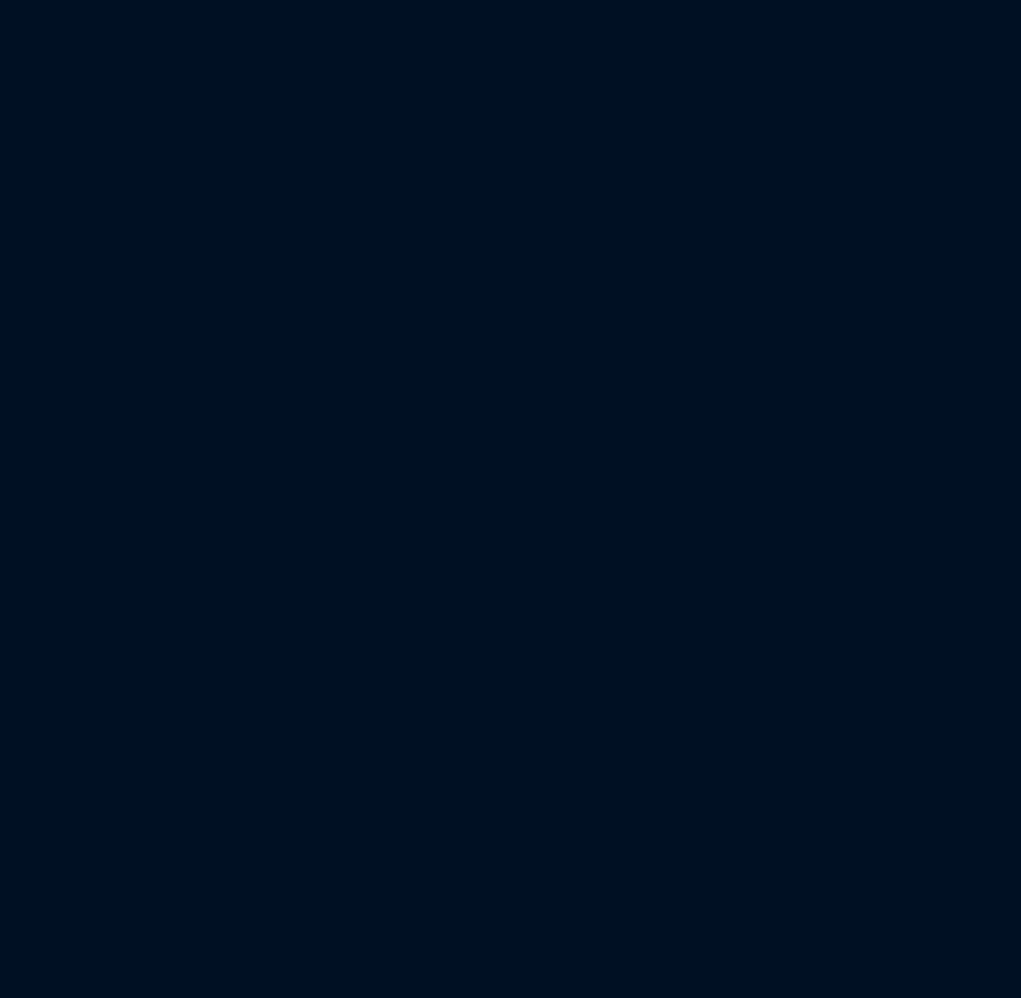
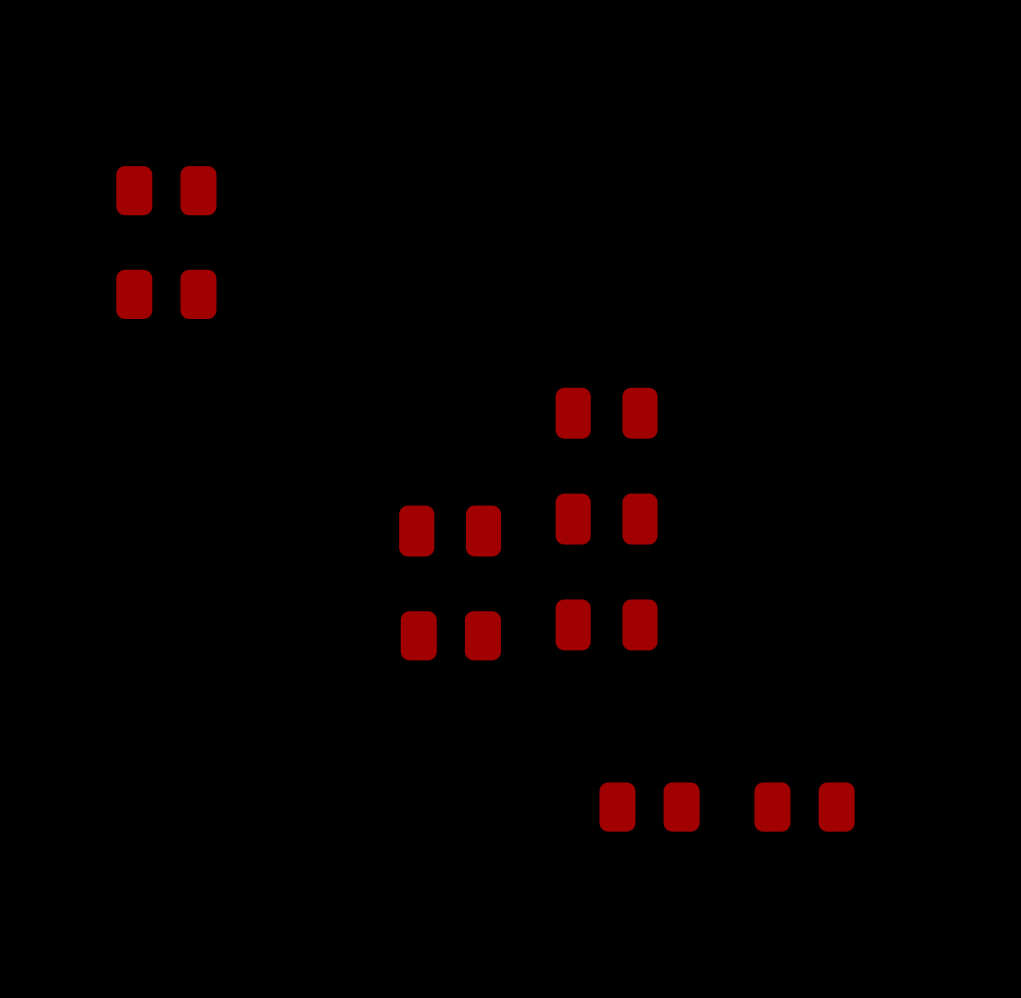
part: none -> (166, 190)
part: none -> (166, 294)
part: none -> (606, 413)
part: none -> (606, 519)
part: none -> (450, 531)
part: none -> (606, 624)
part: none -> (450, 635)
part: none -> (649, 807)
part: none -> (804, 807)

